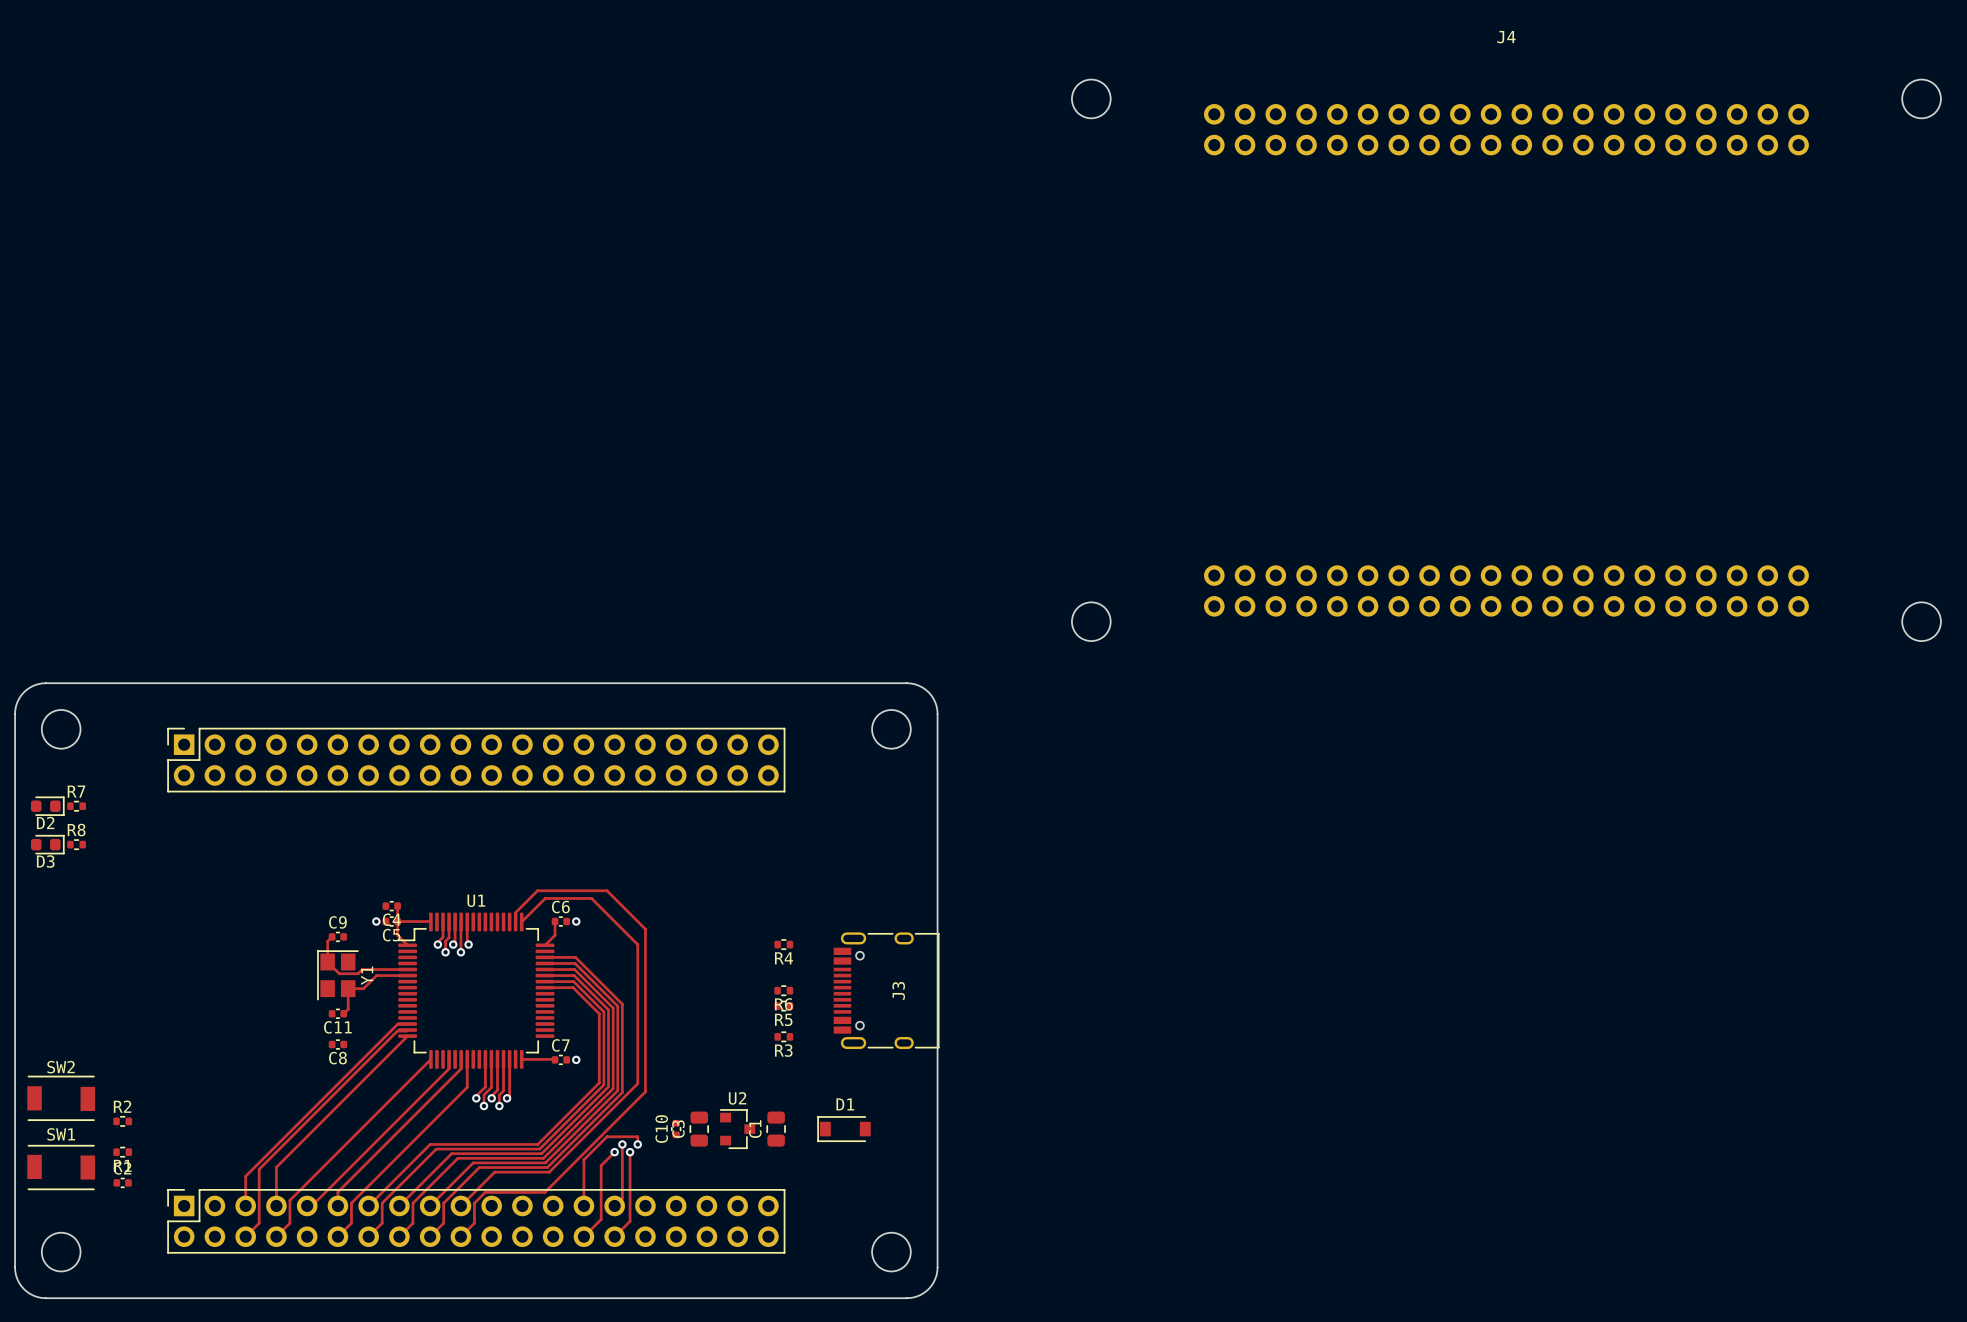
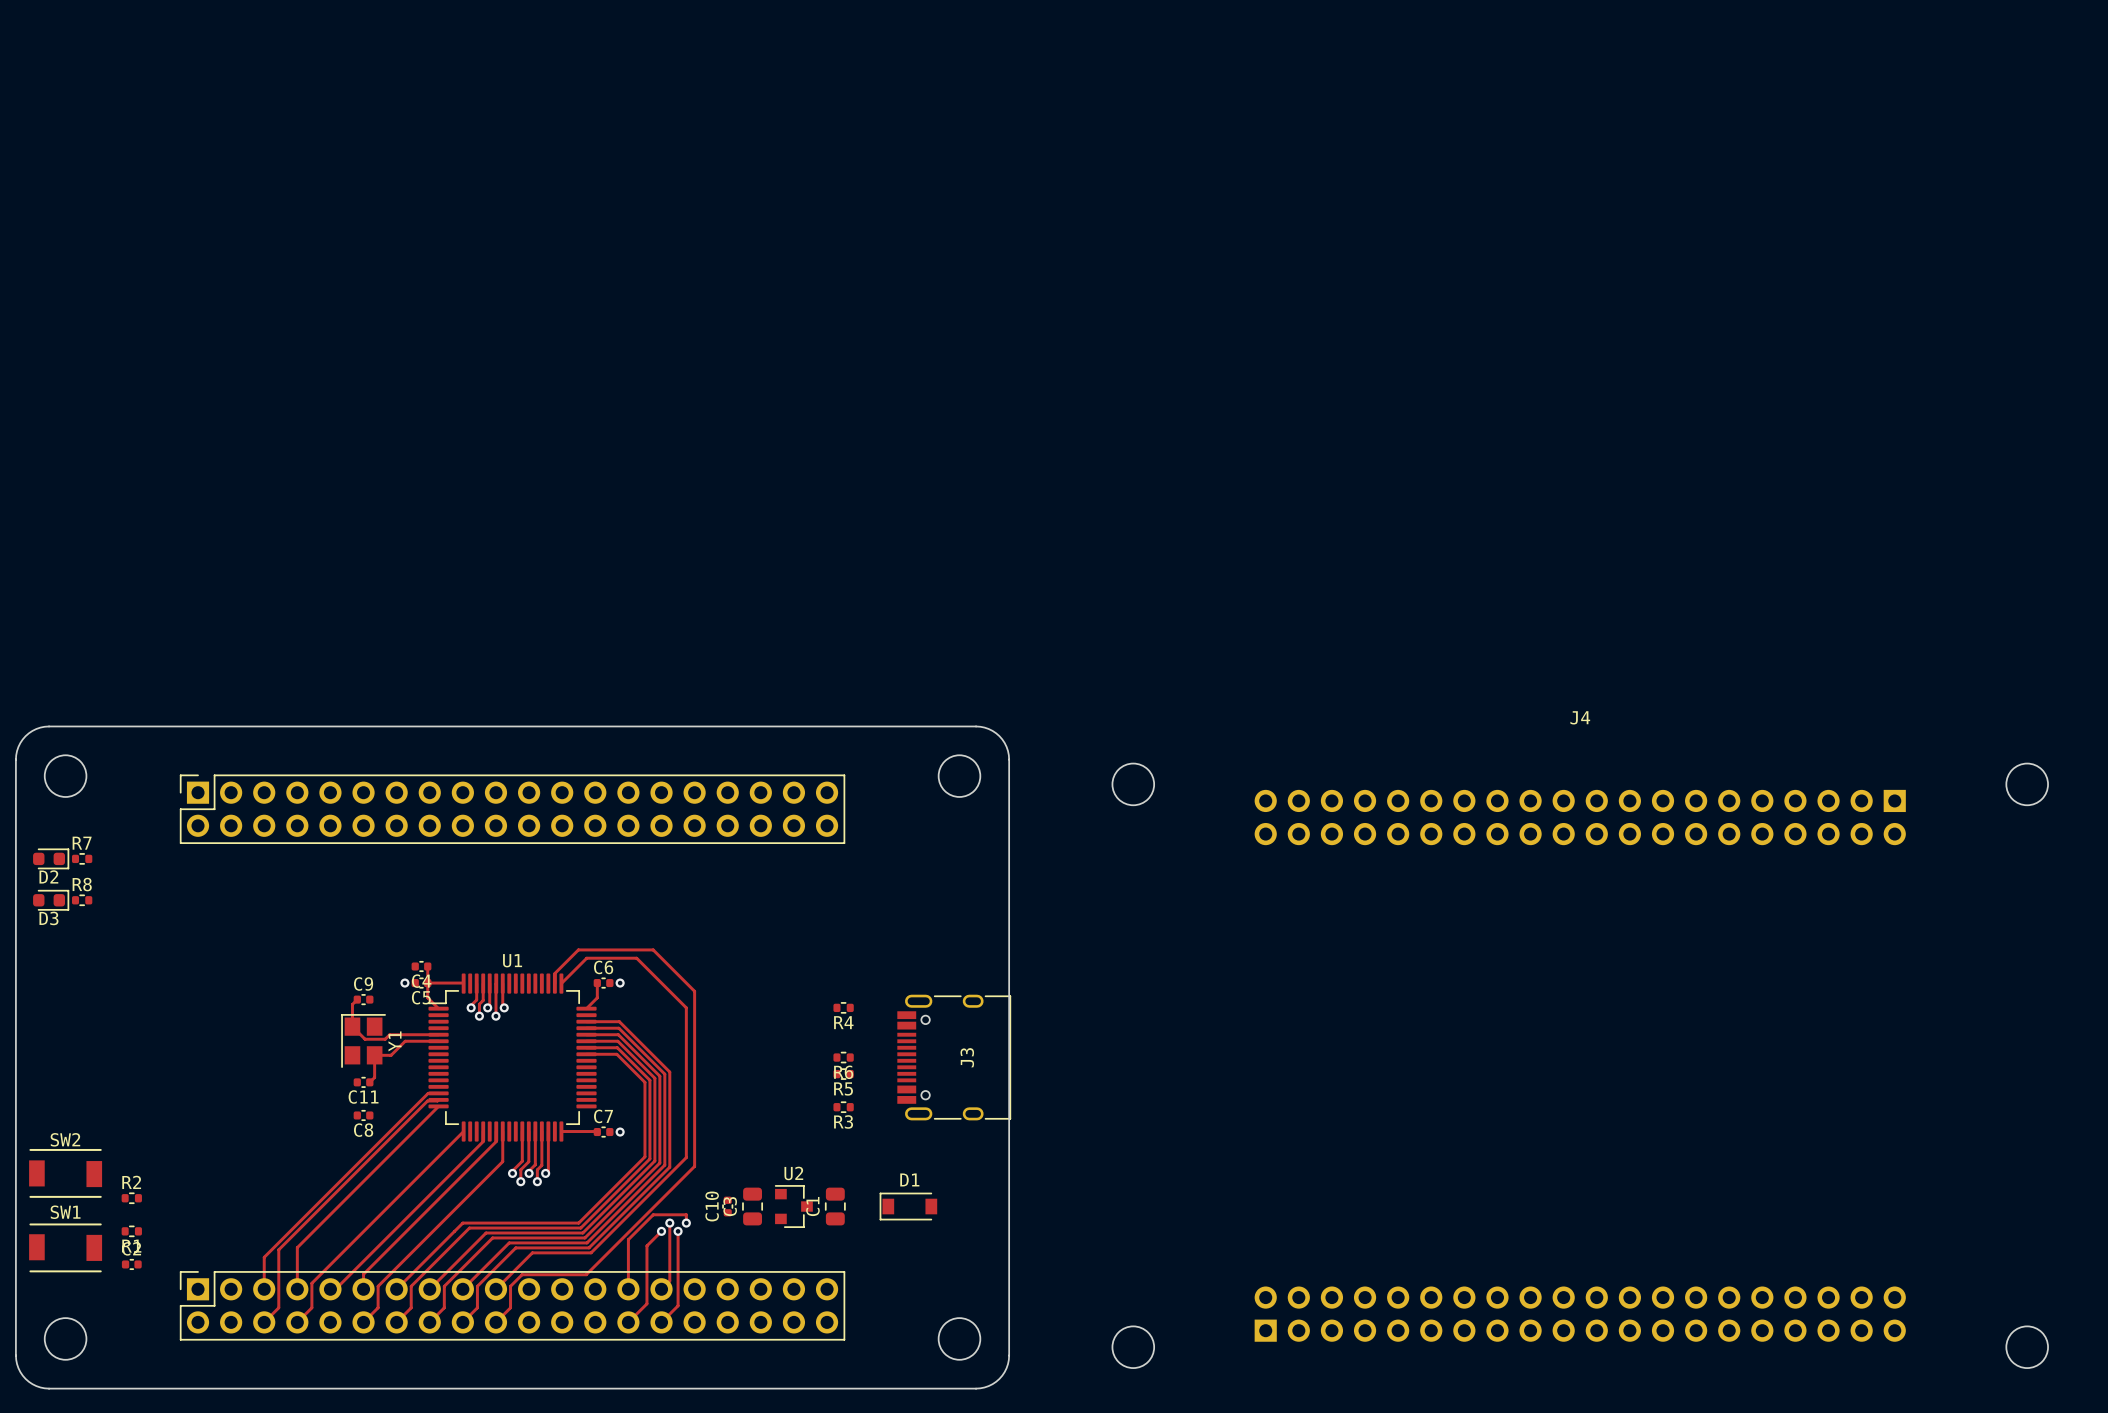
J4 footprint: [1071, 79, 1941, 642] -> [1112, 763, 2049, 1369]

